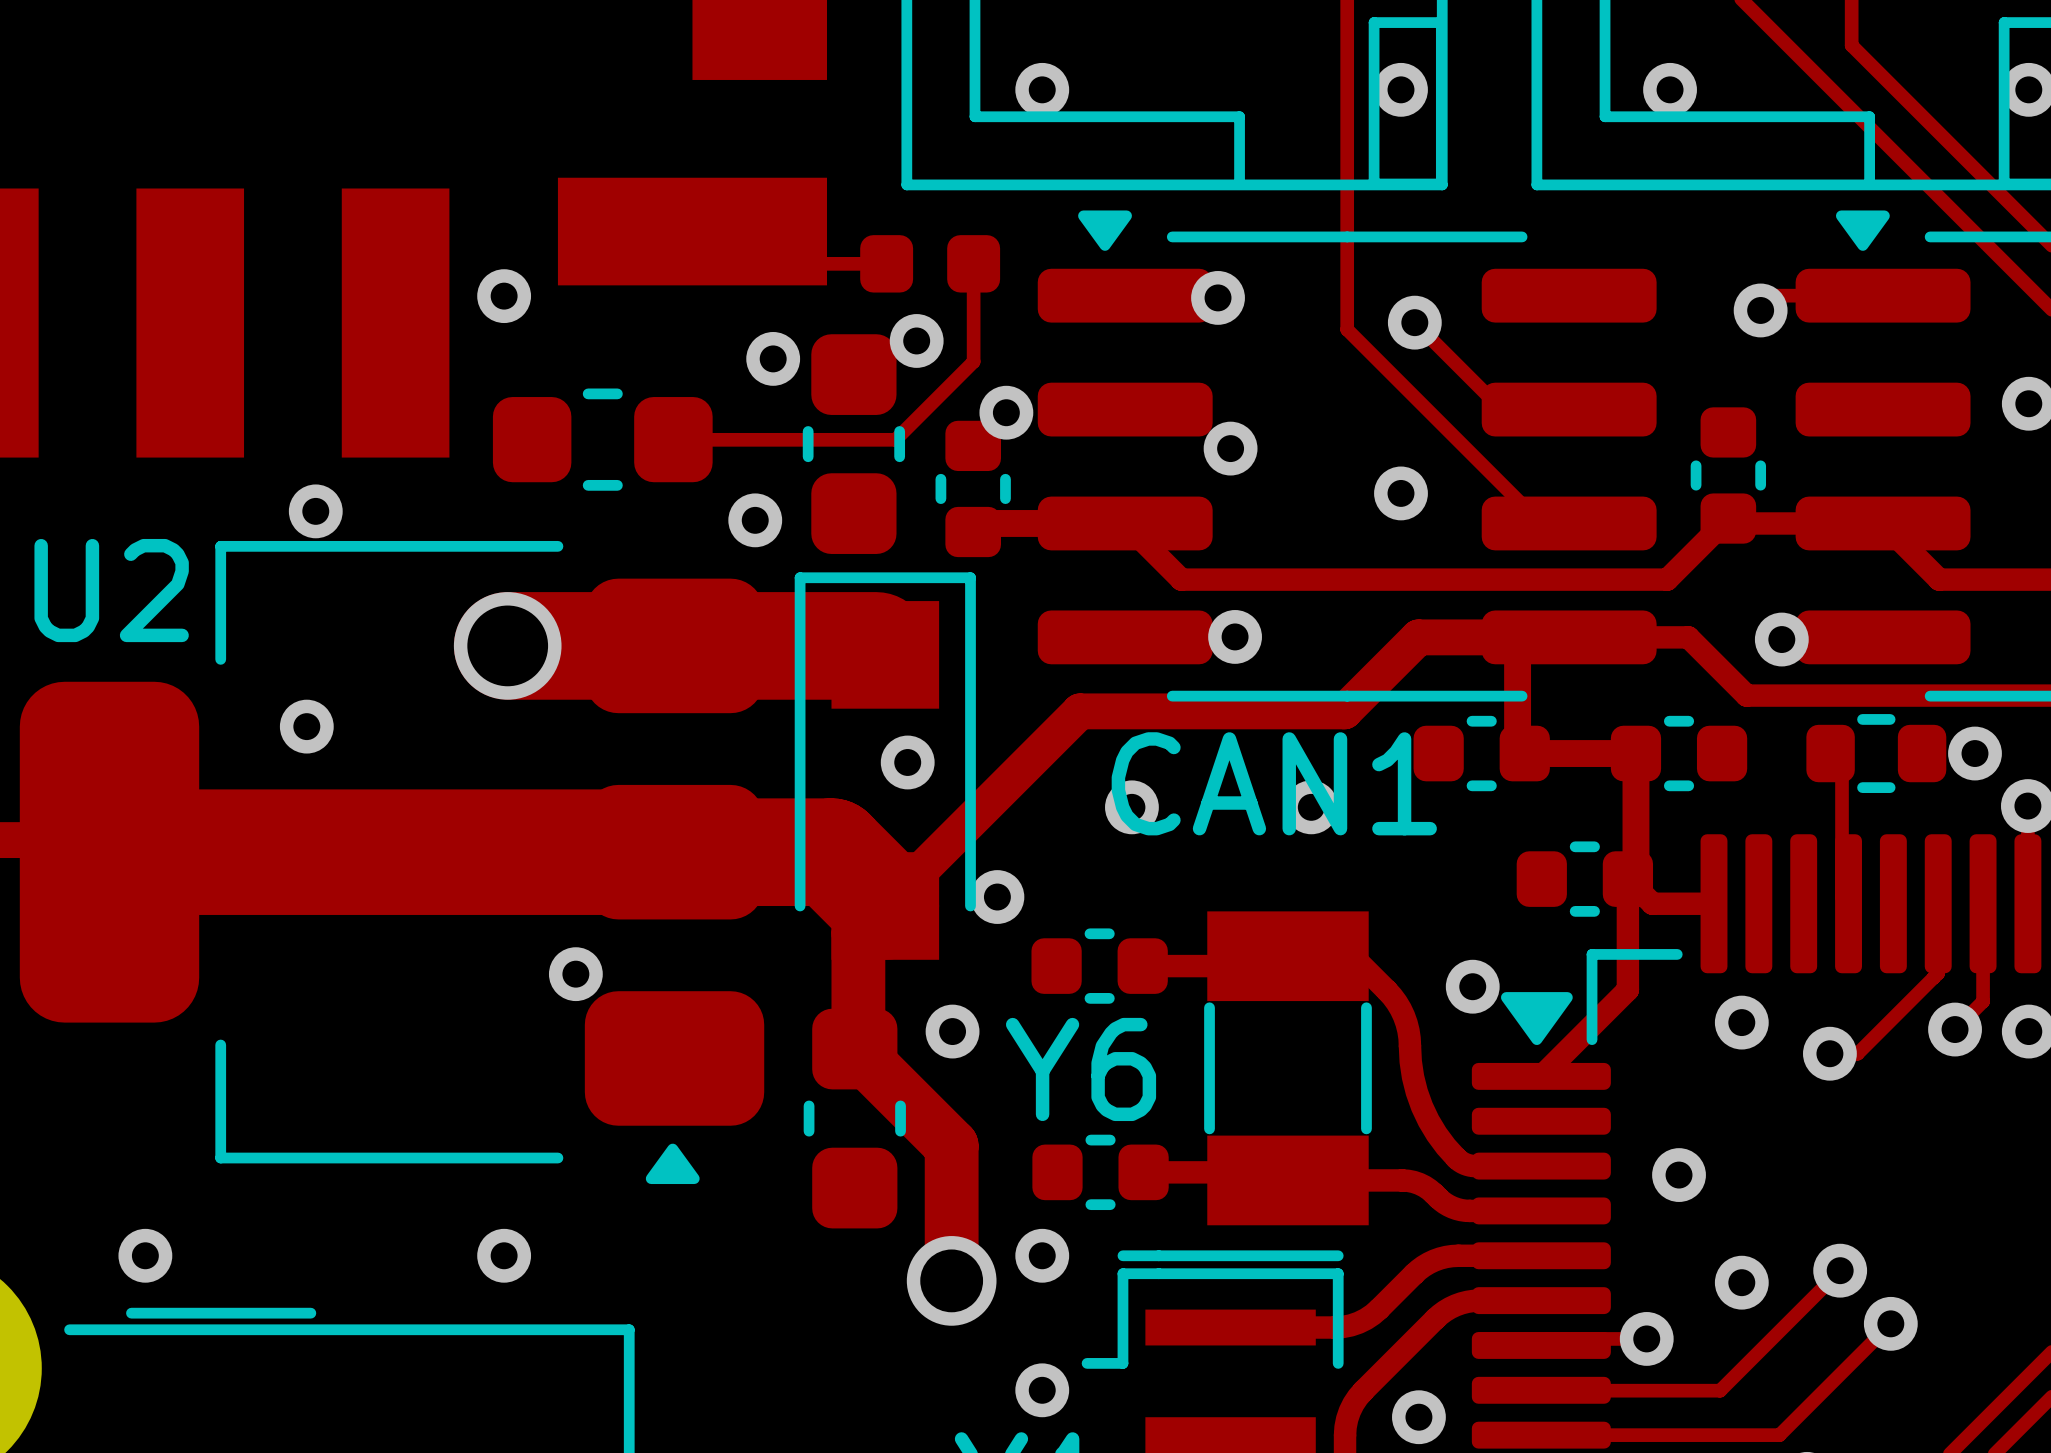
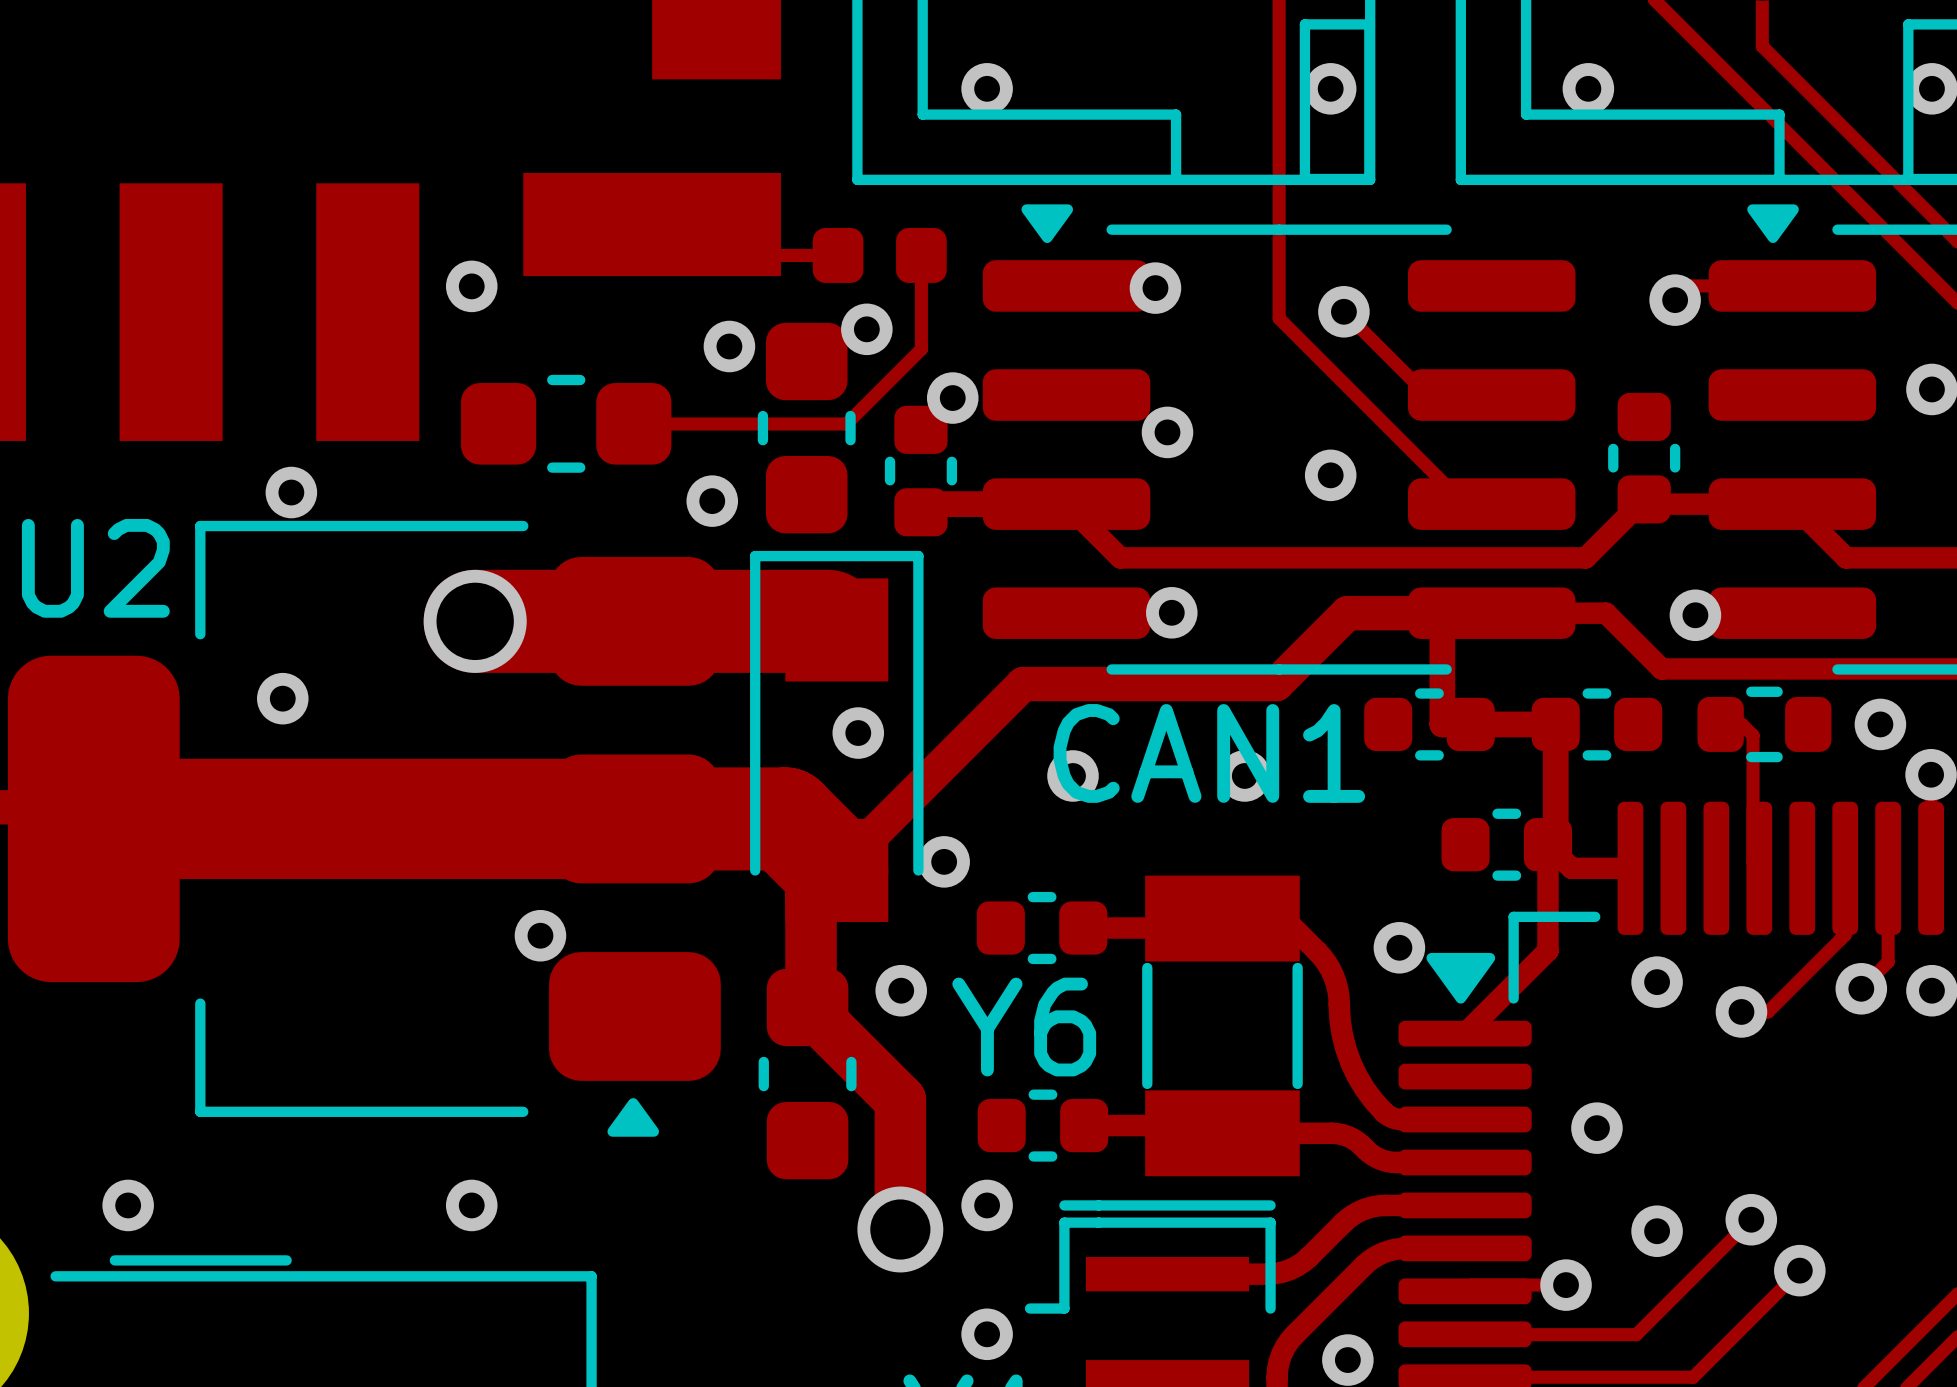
part position: (1481, 753) -> (1429, 724)
part position: (1876, 753) -> (1764, 724)

